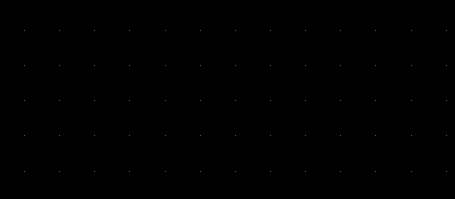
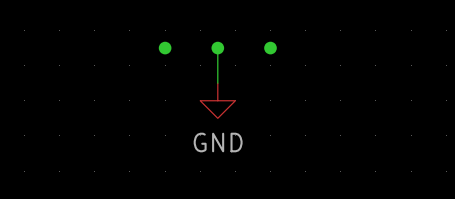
junction: none -> (165, 48)
wire: none -> (217, 48) (217, 83)
junction: none -> (217, 48)
junction: none -> (270, 48)
power symbol: none -> GND (217, 100)

